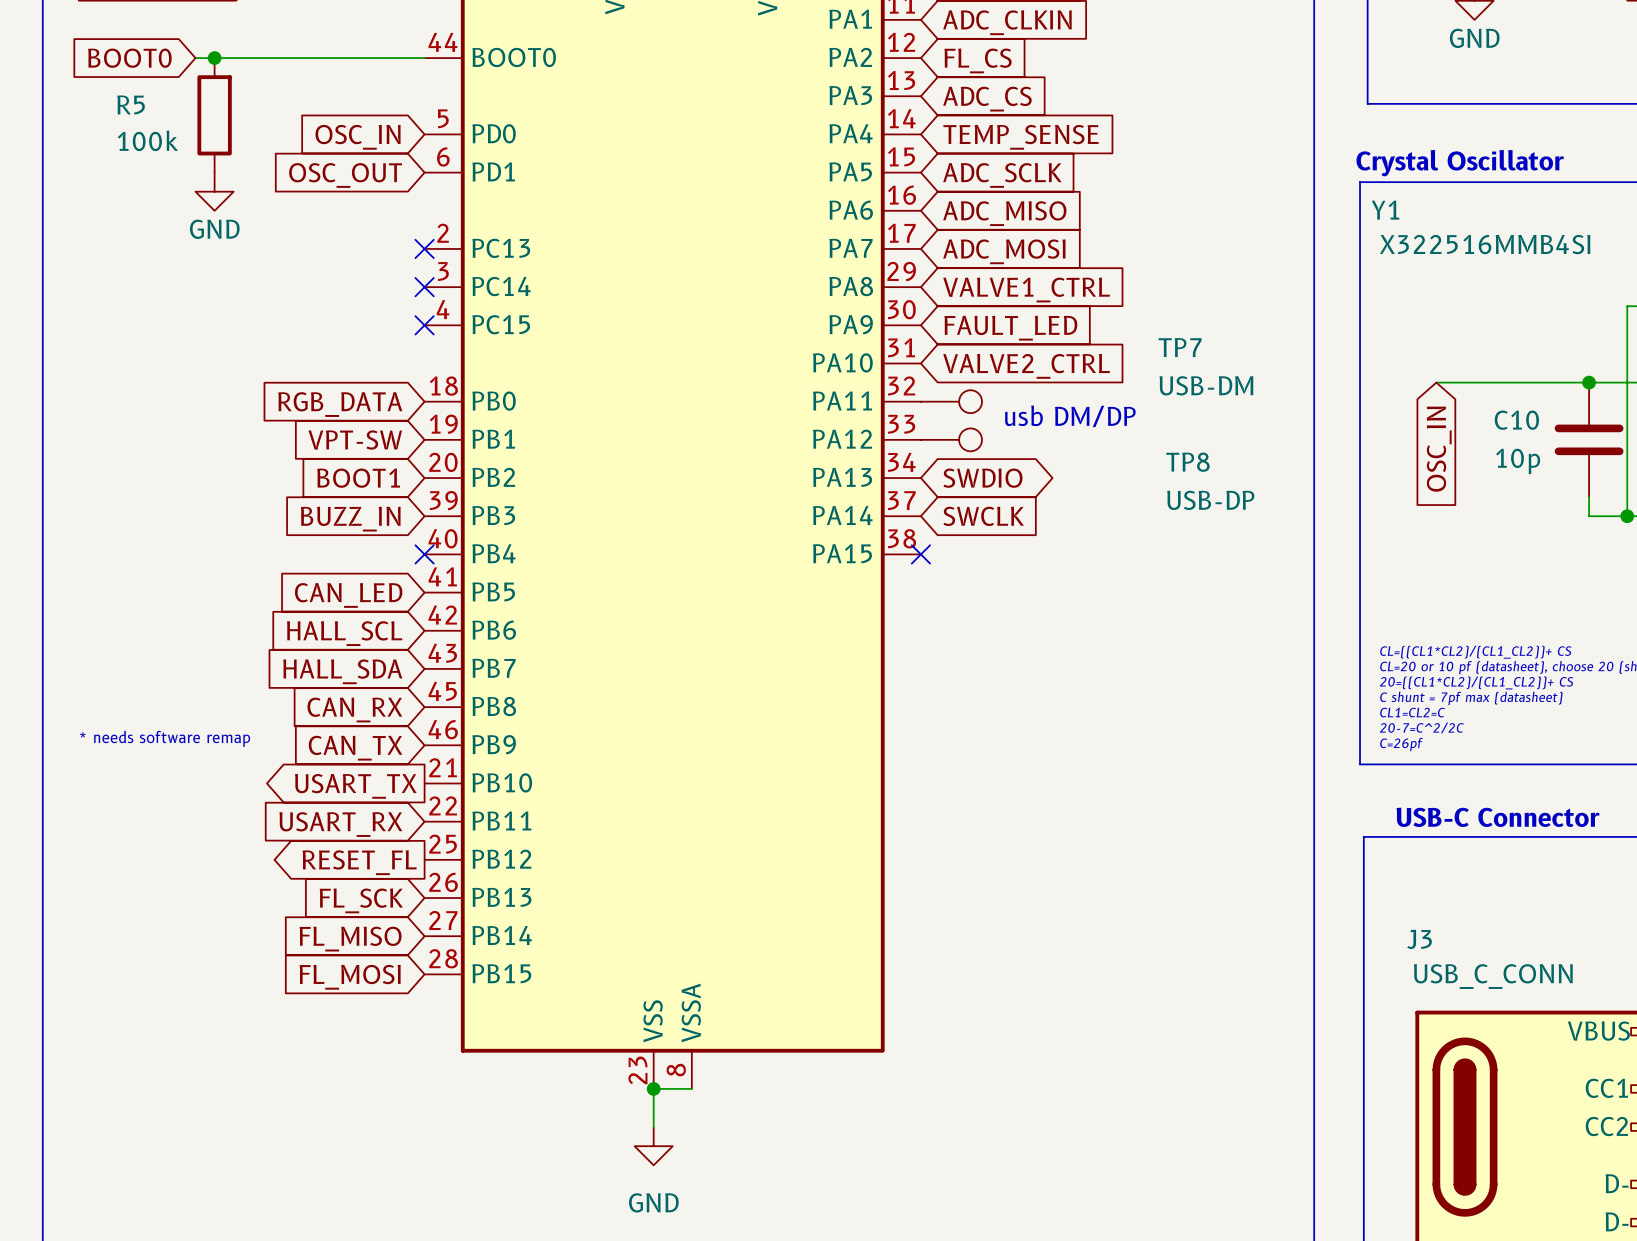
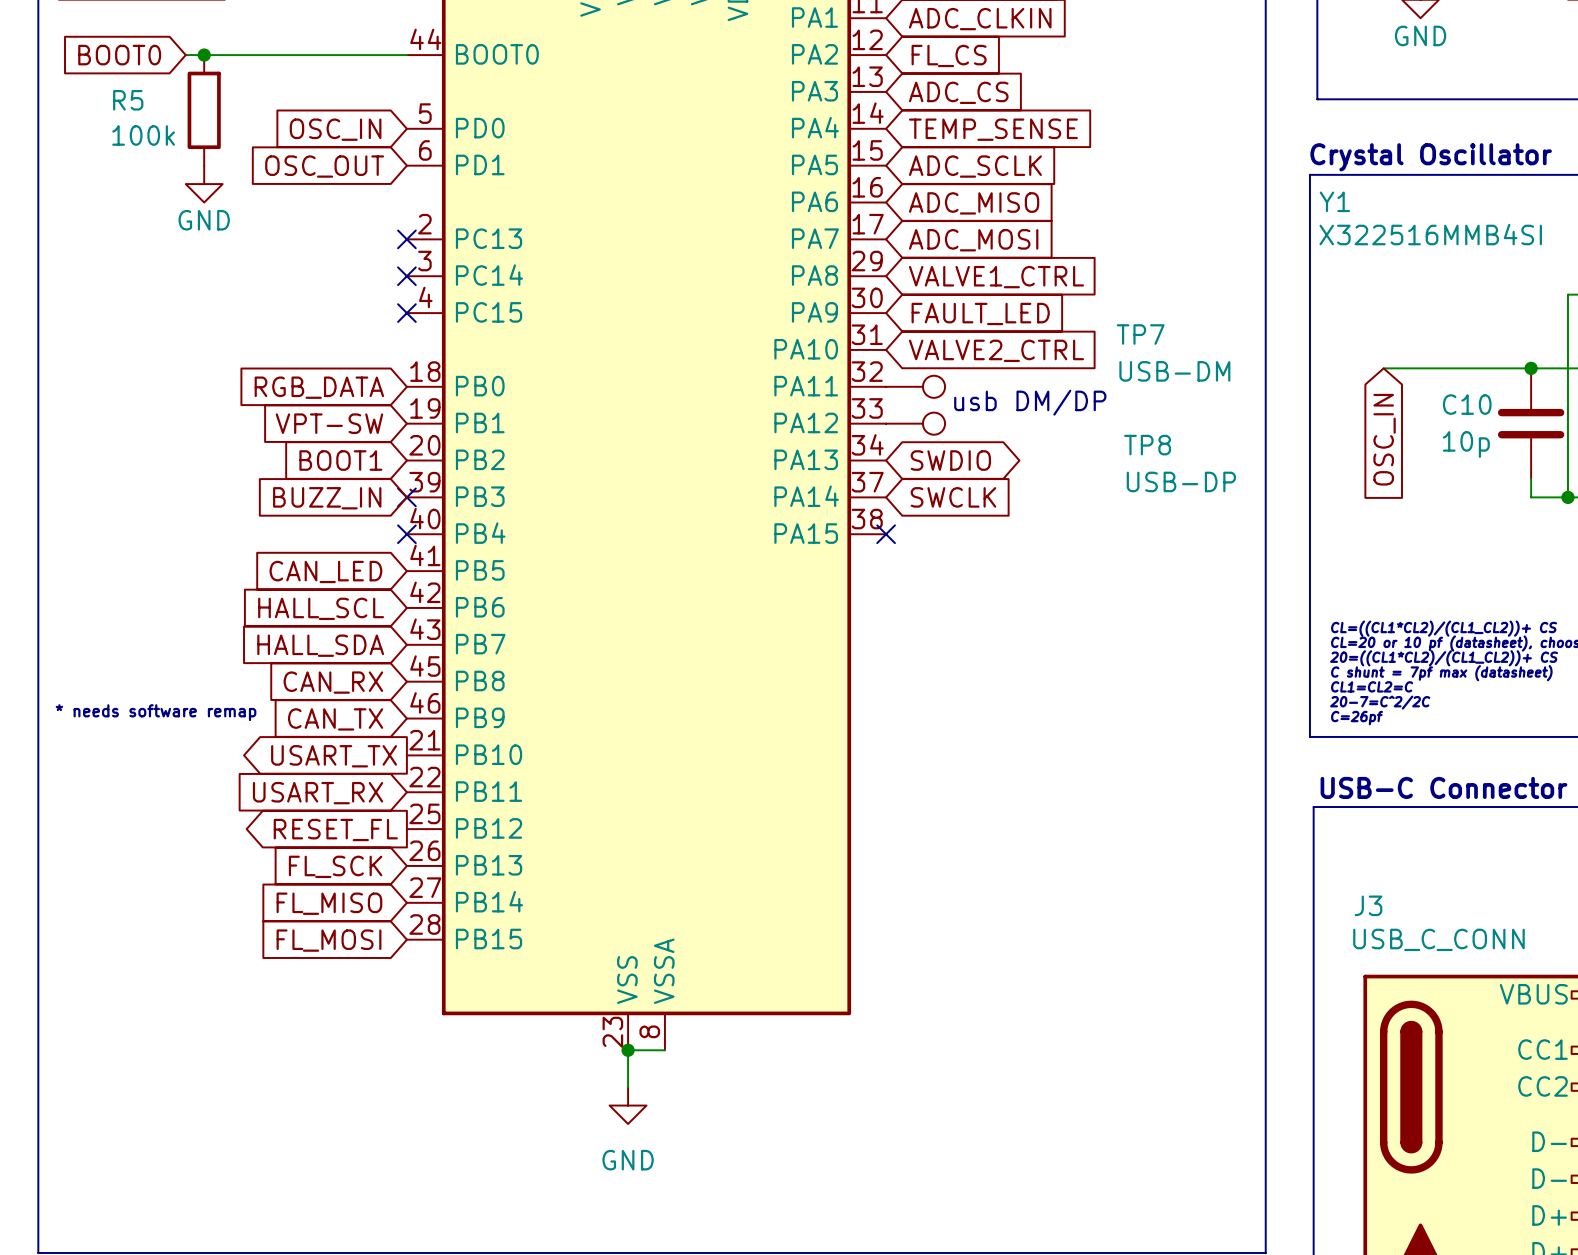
no-connect mark: none -> (406, 497)

